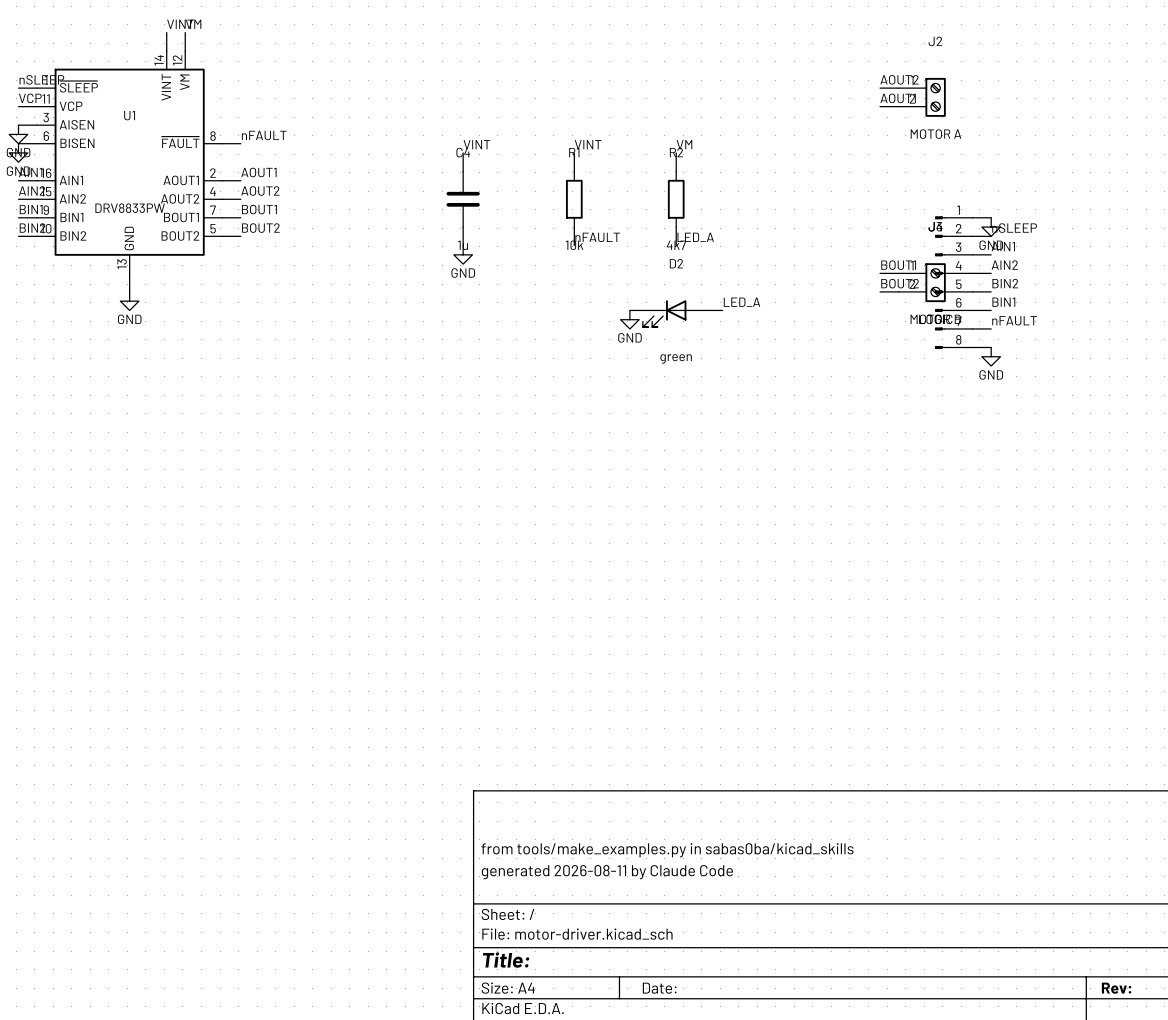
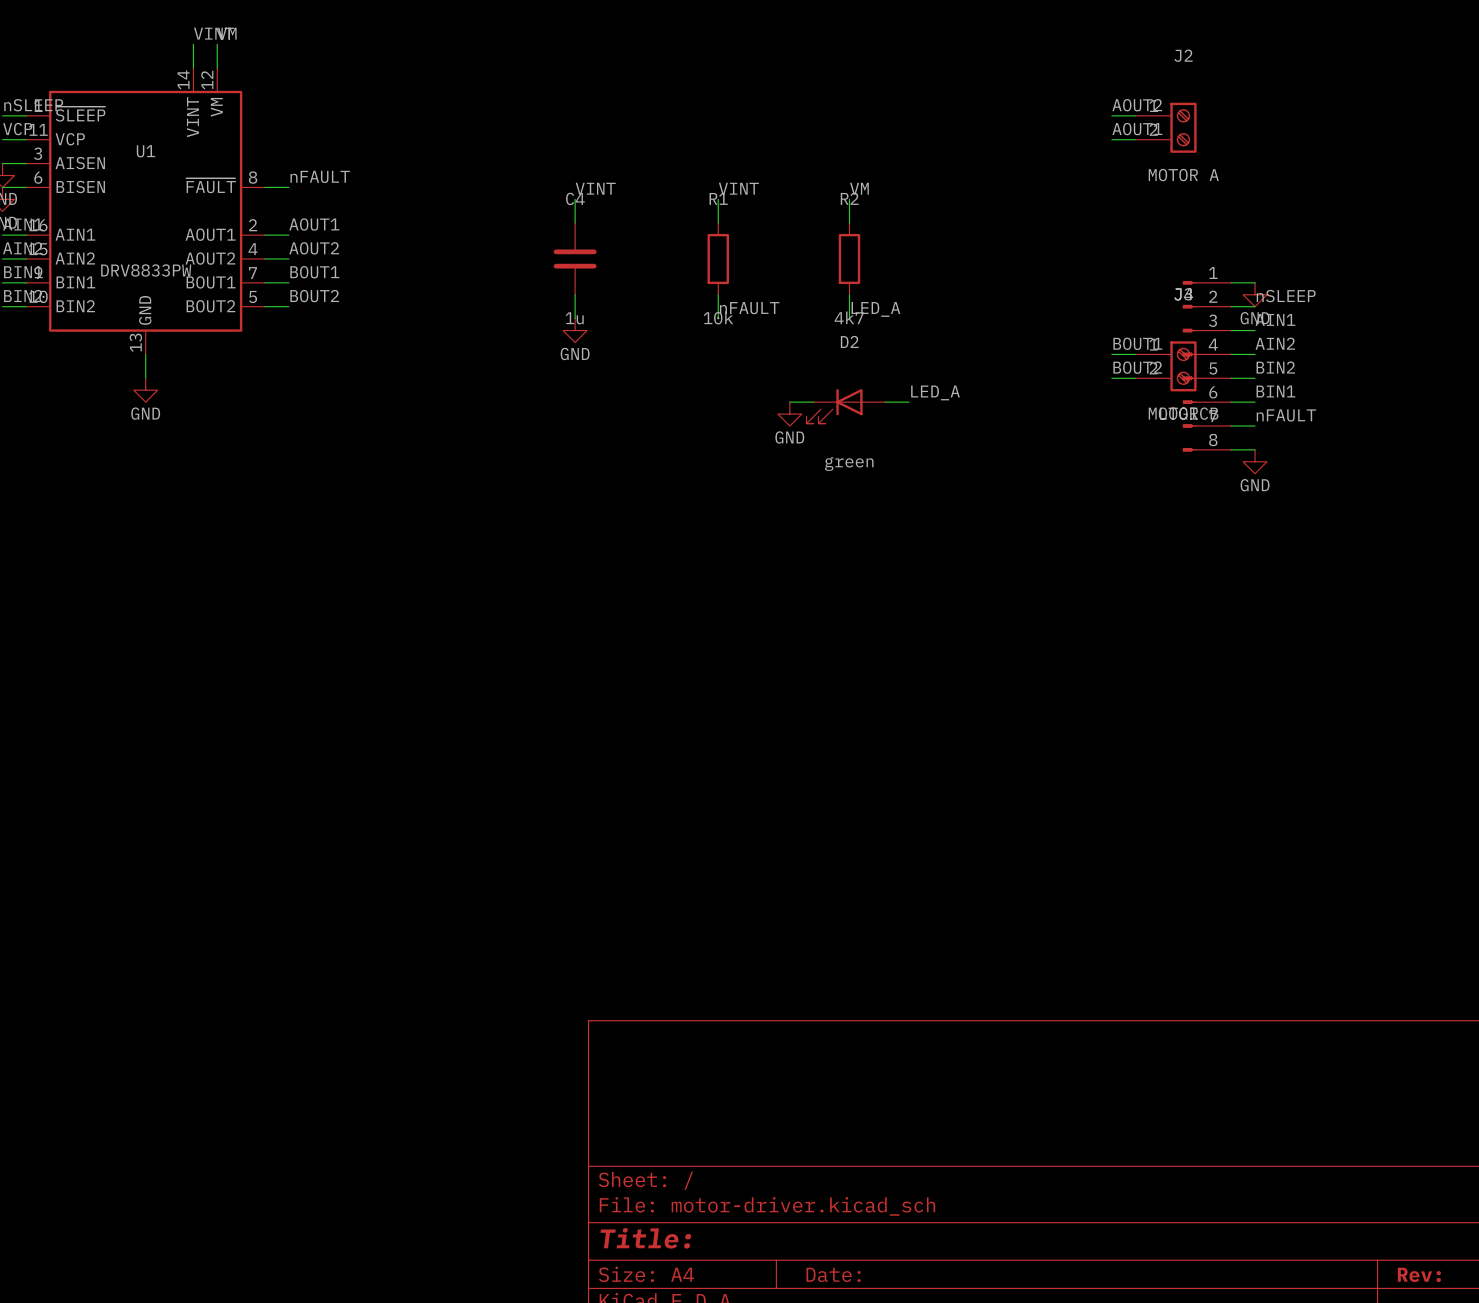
title block: from tools/make_examples.py in sabas0ba/kicad_skills (667, 850) -> none
title block: generated 2026-08-11 by Claude Code (607, 872) -> none

